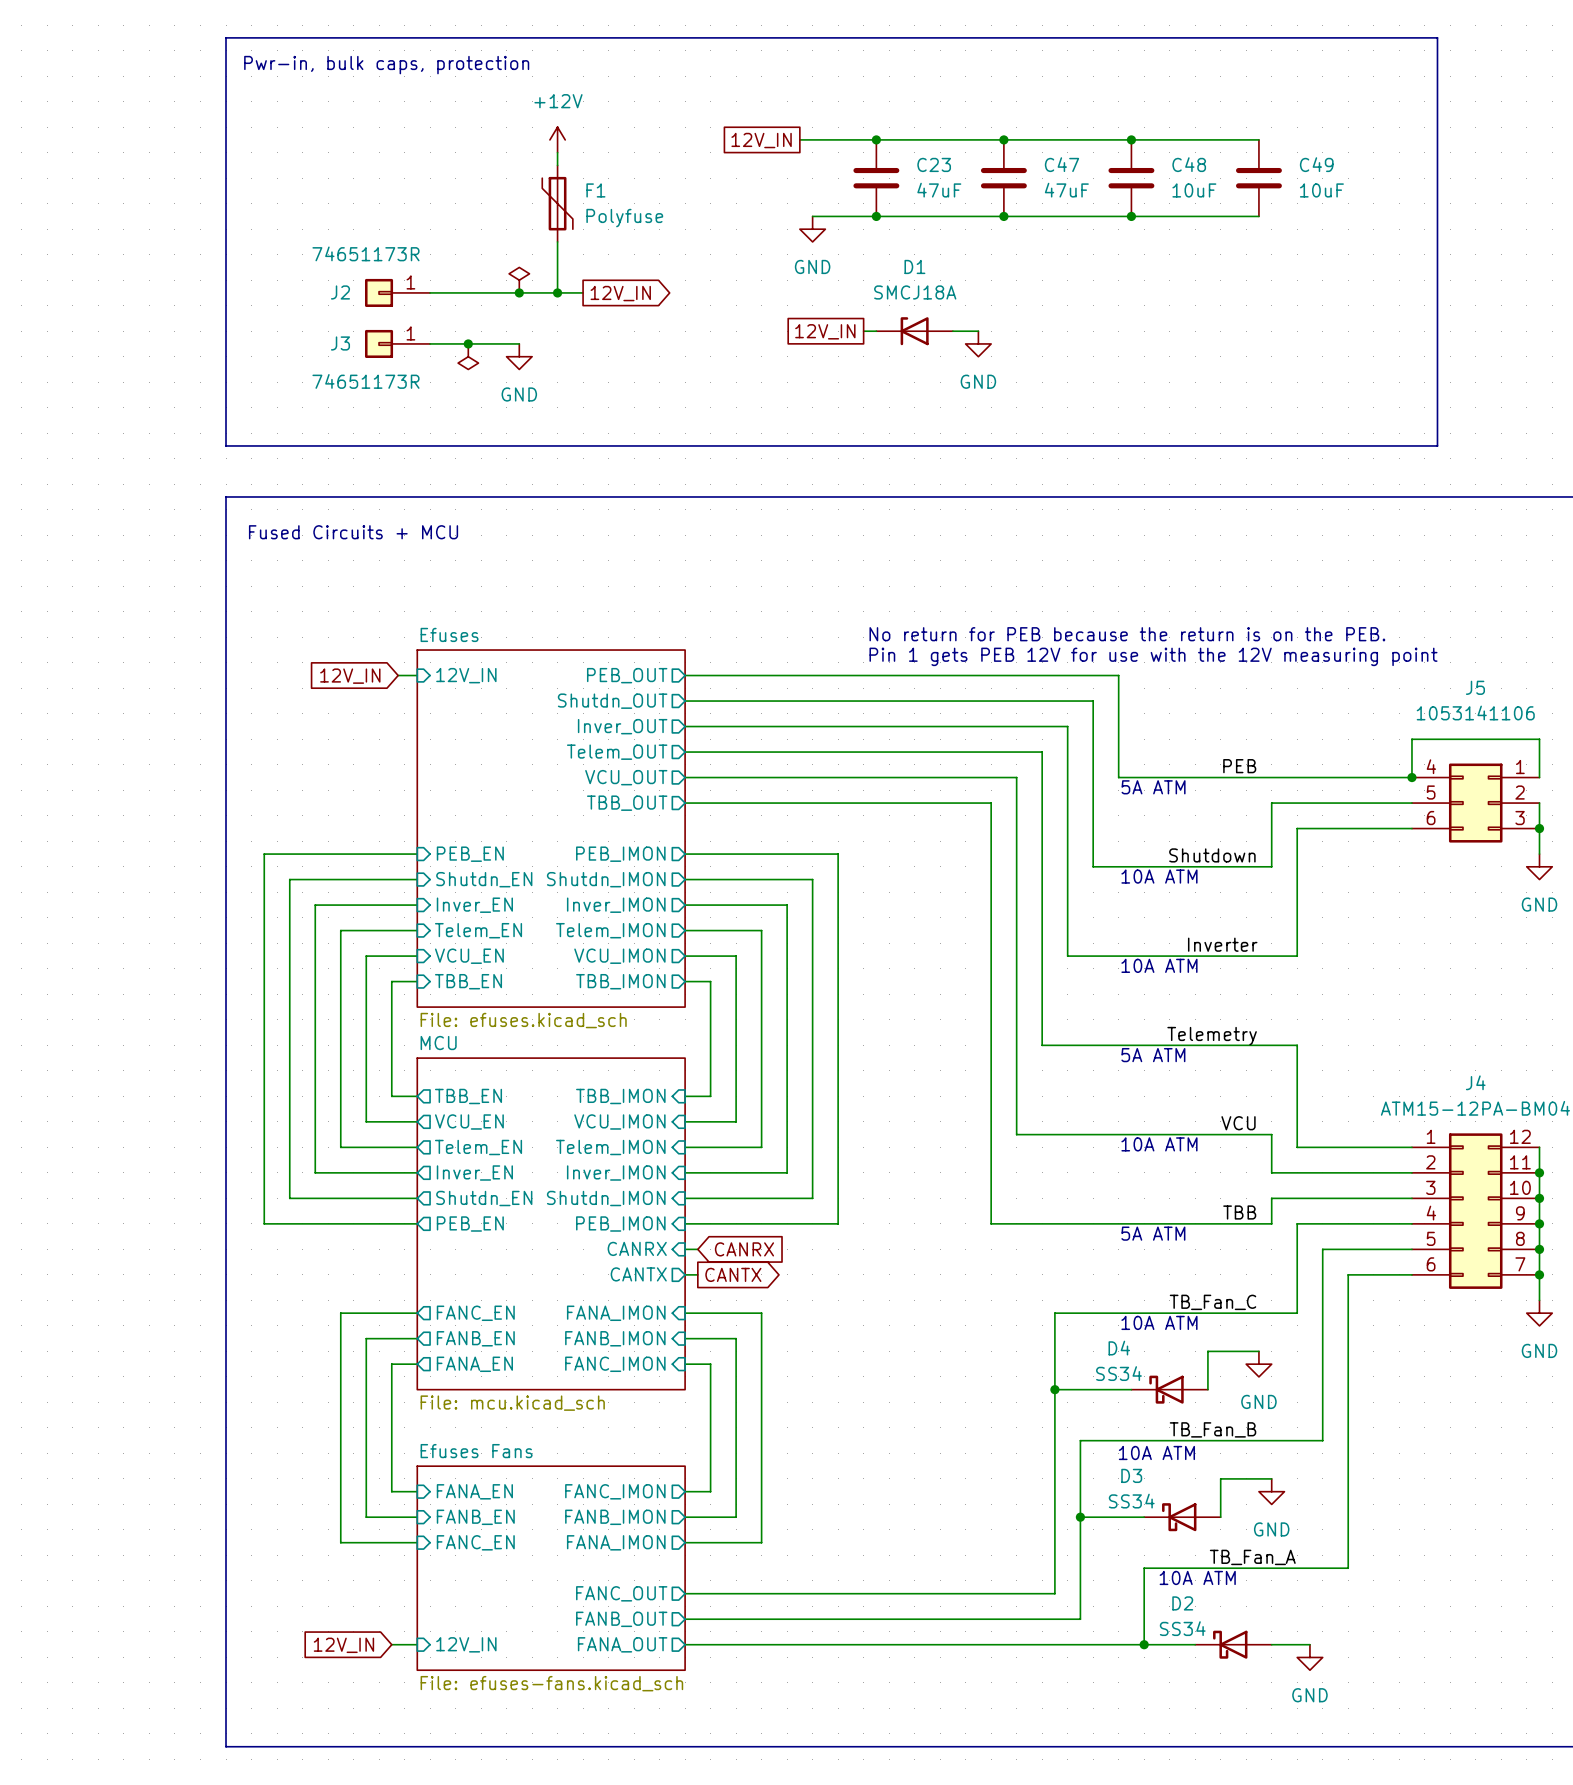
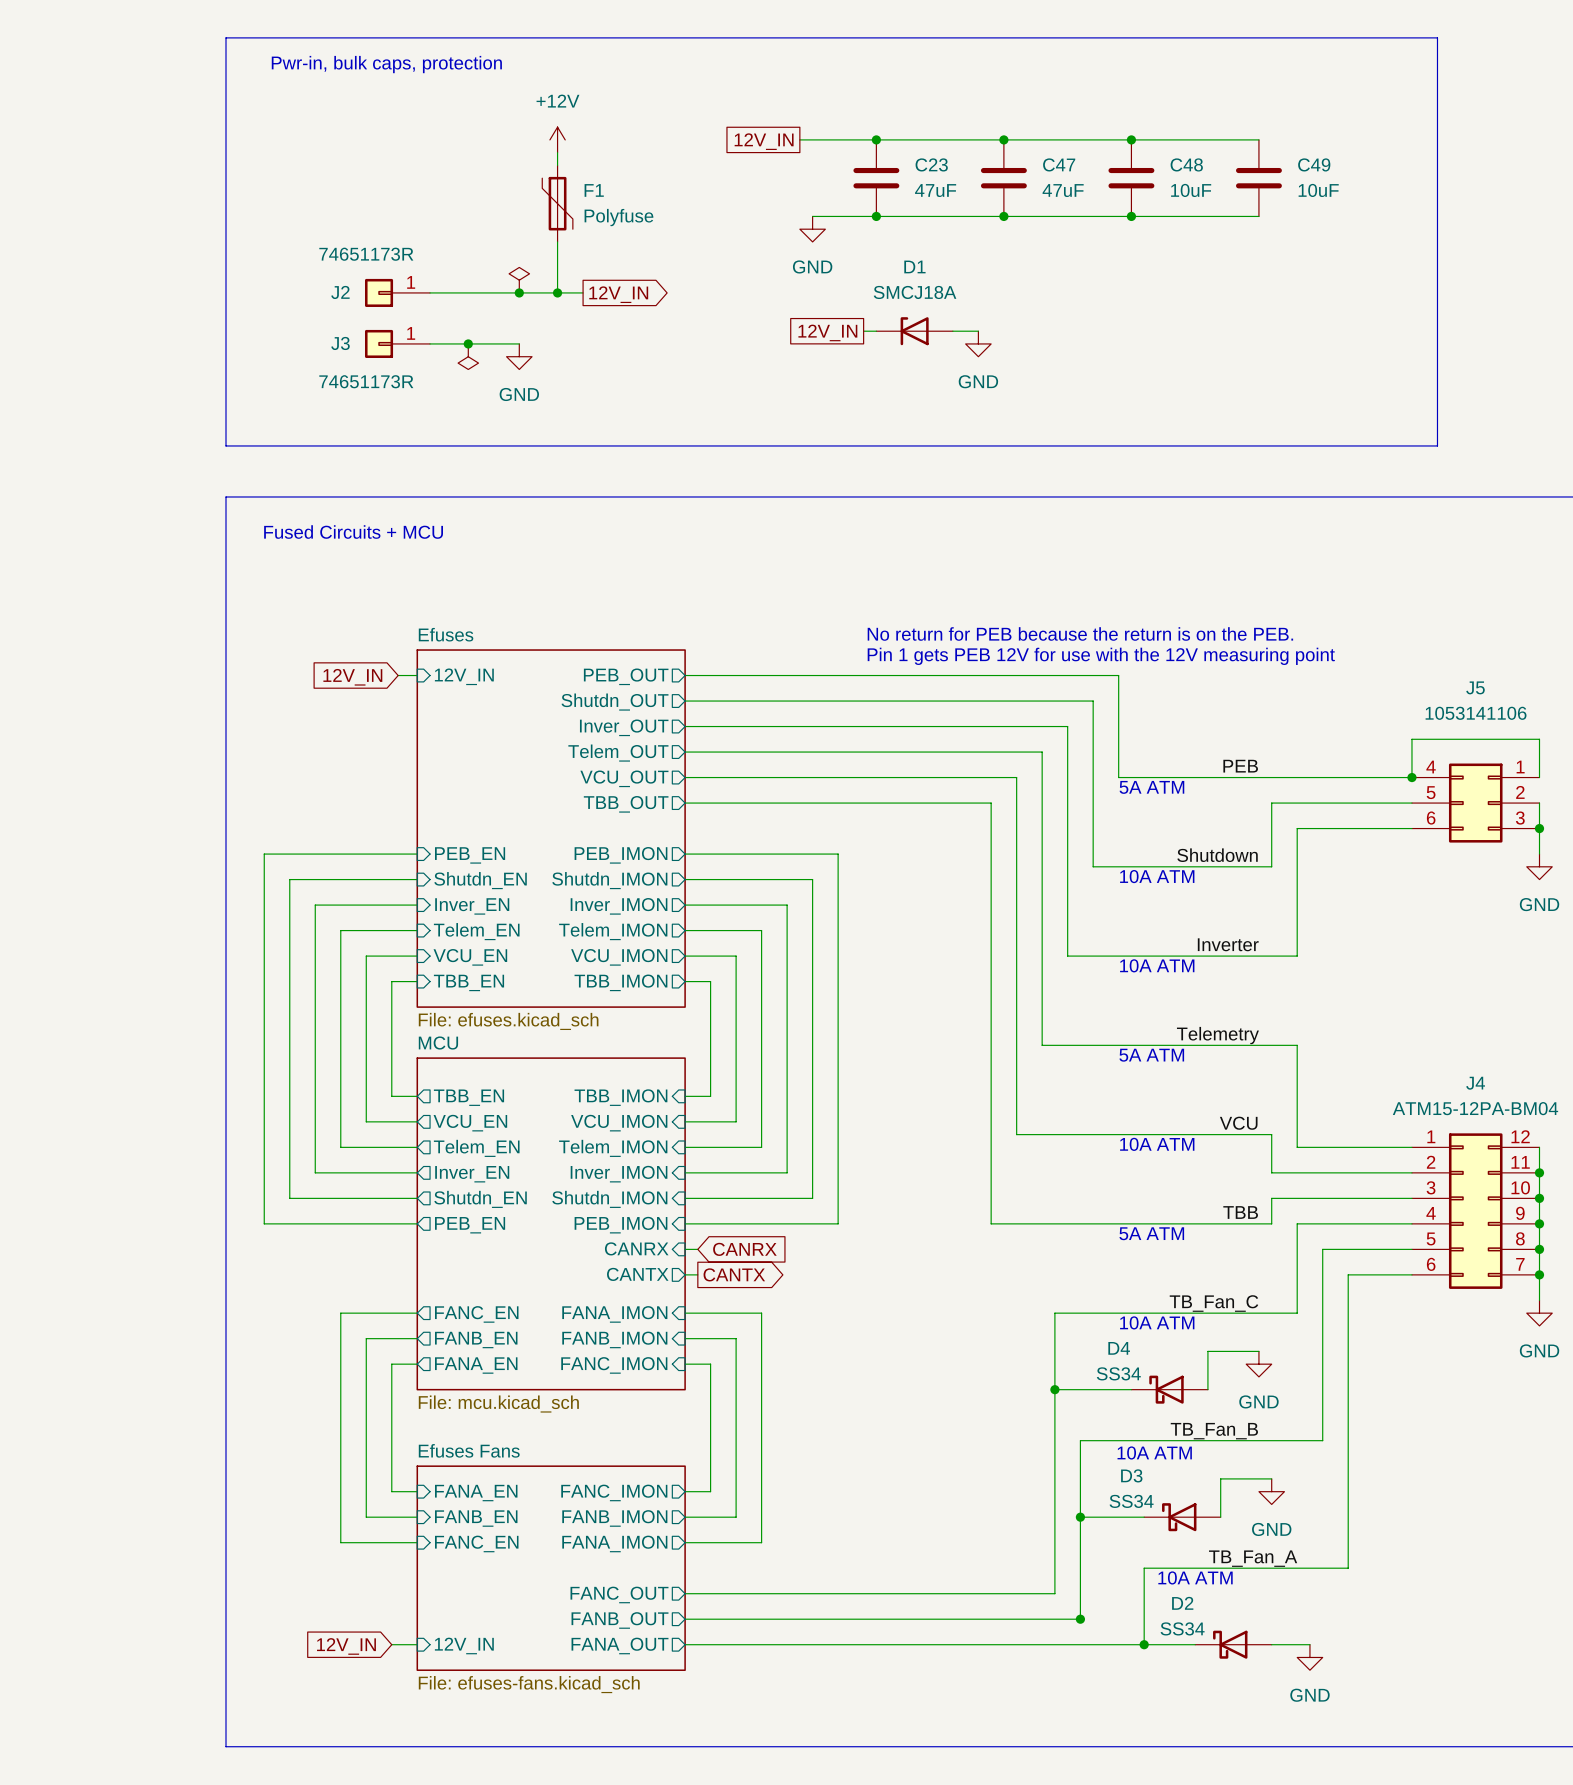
junction: none -> (1080, 1619)

